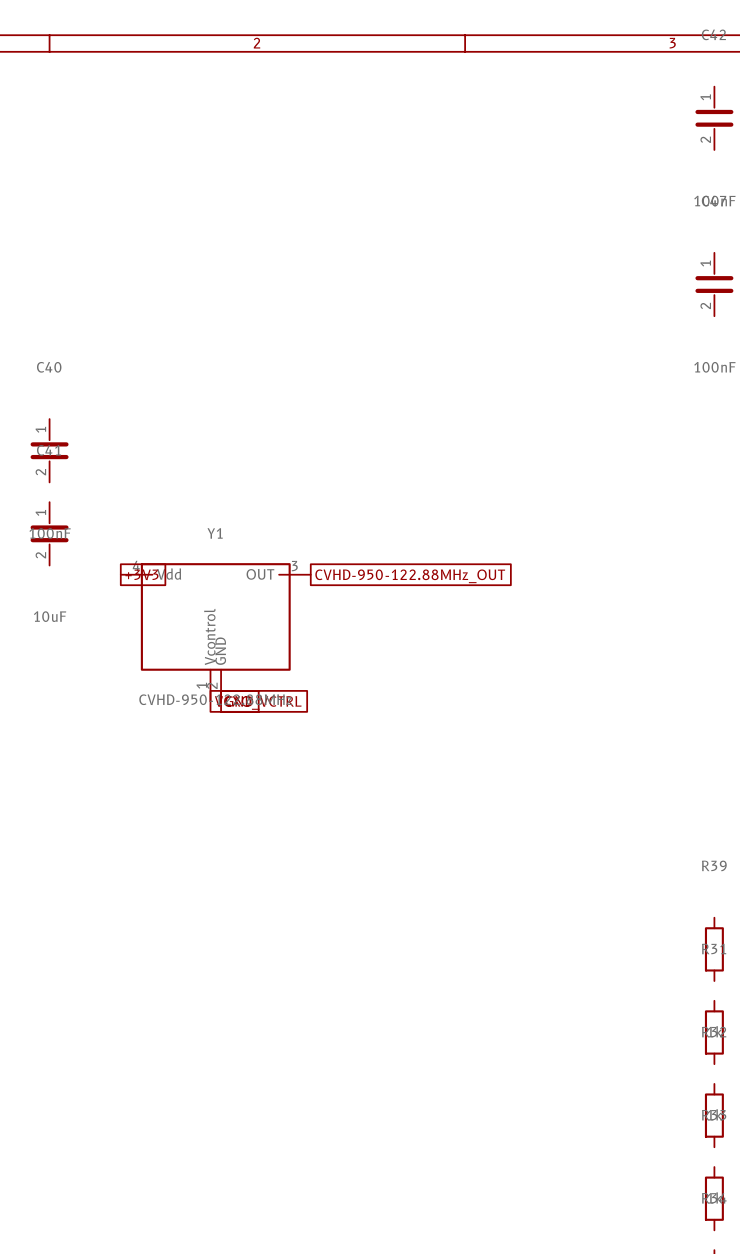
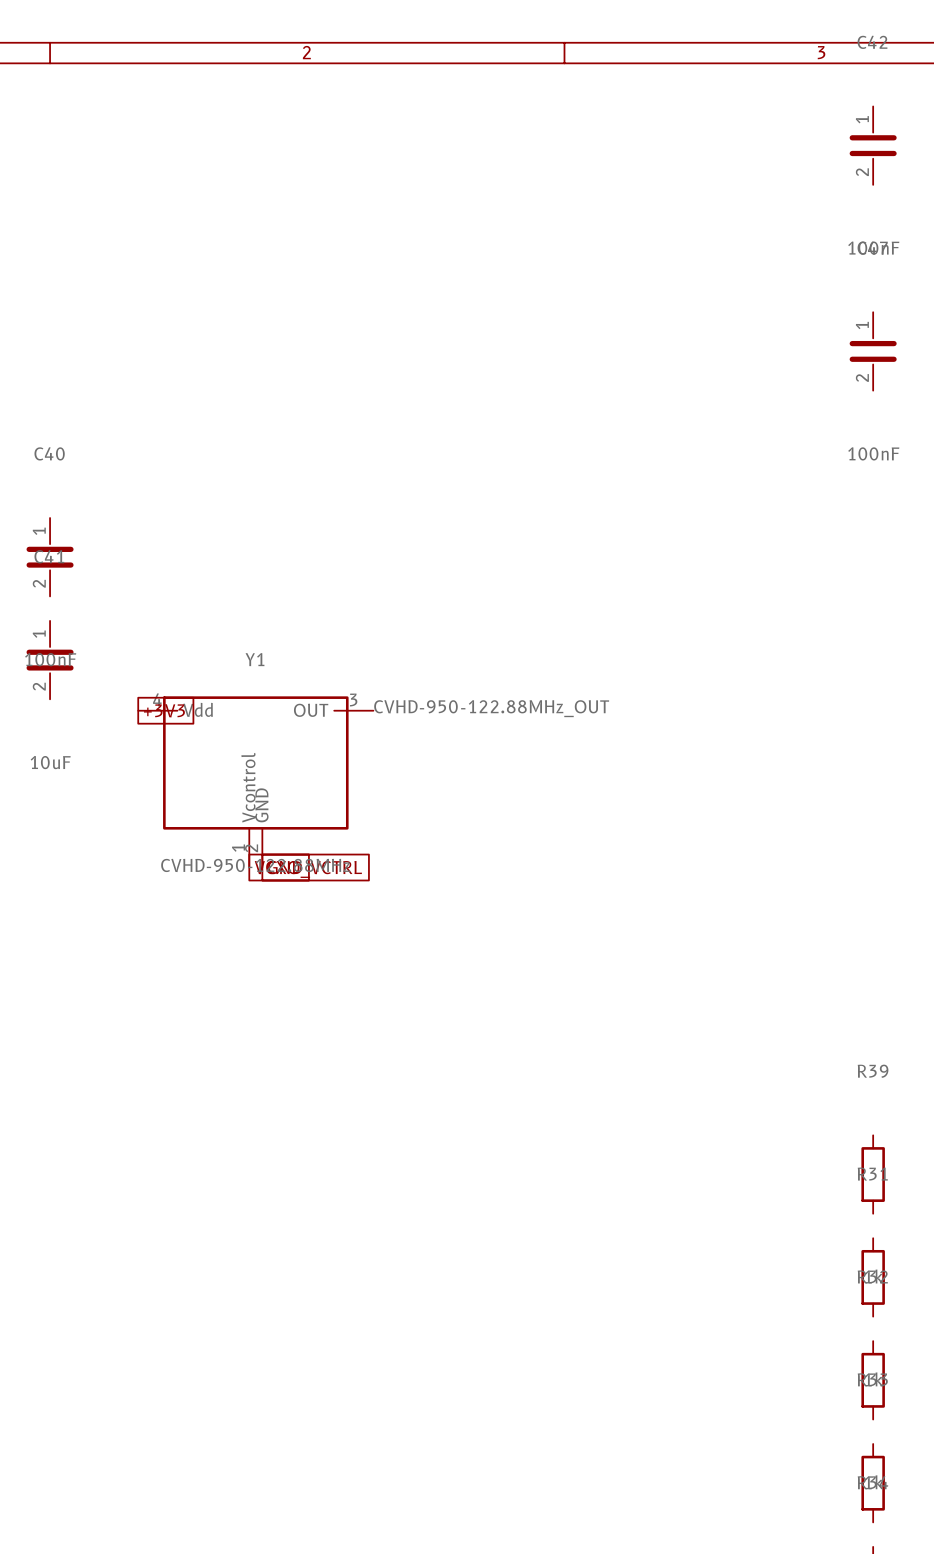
label: none -> CVHD-950-122.88MHz_OUT (491, 708)
global label: CVHD-950-122.88MHz_OUT (410, 576) -> none

